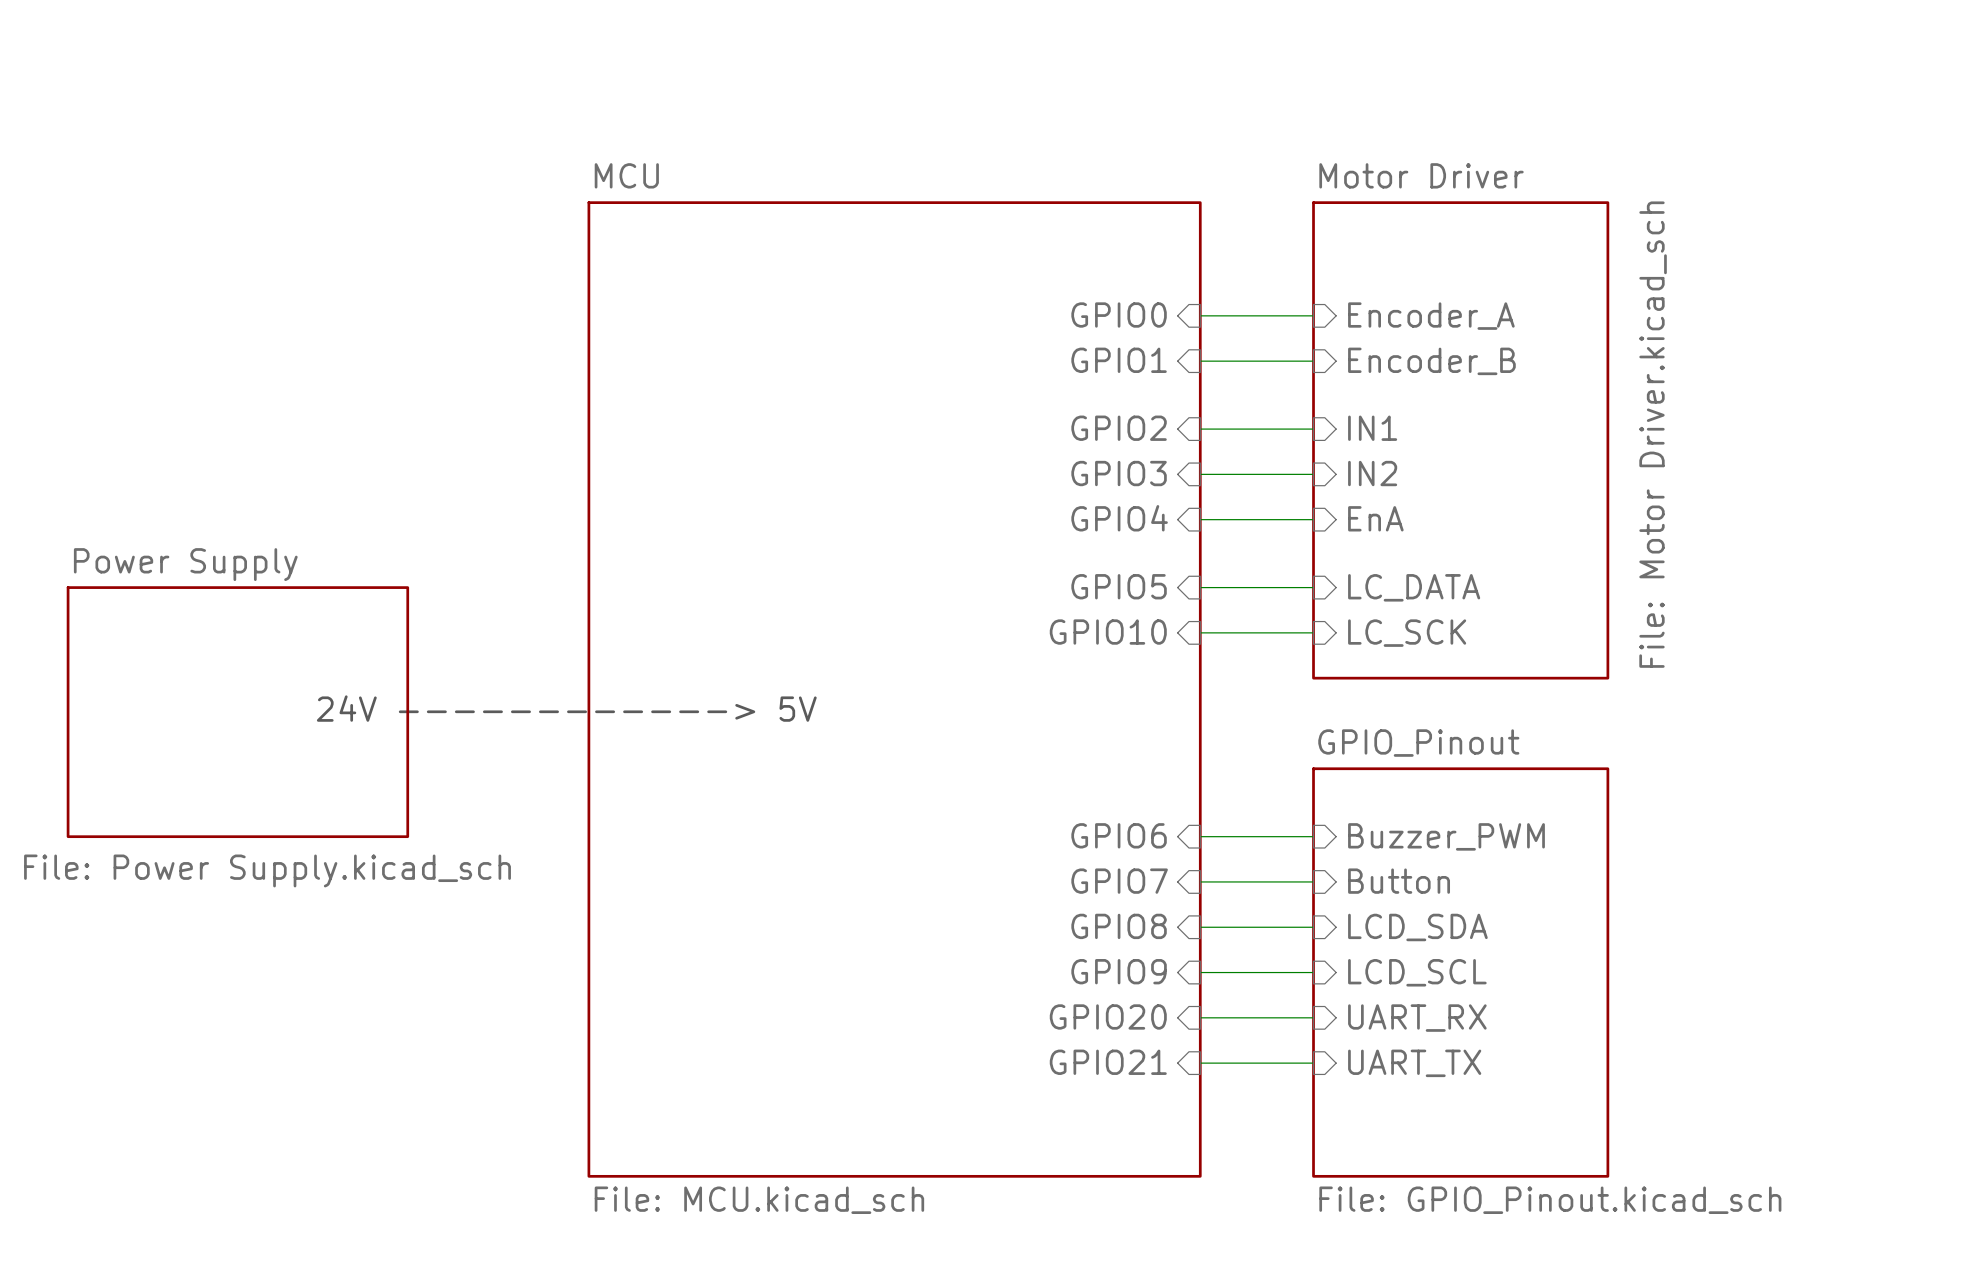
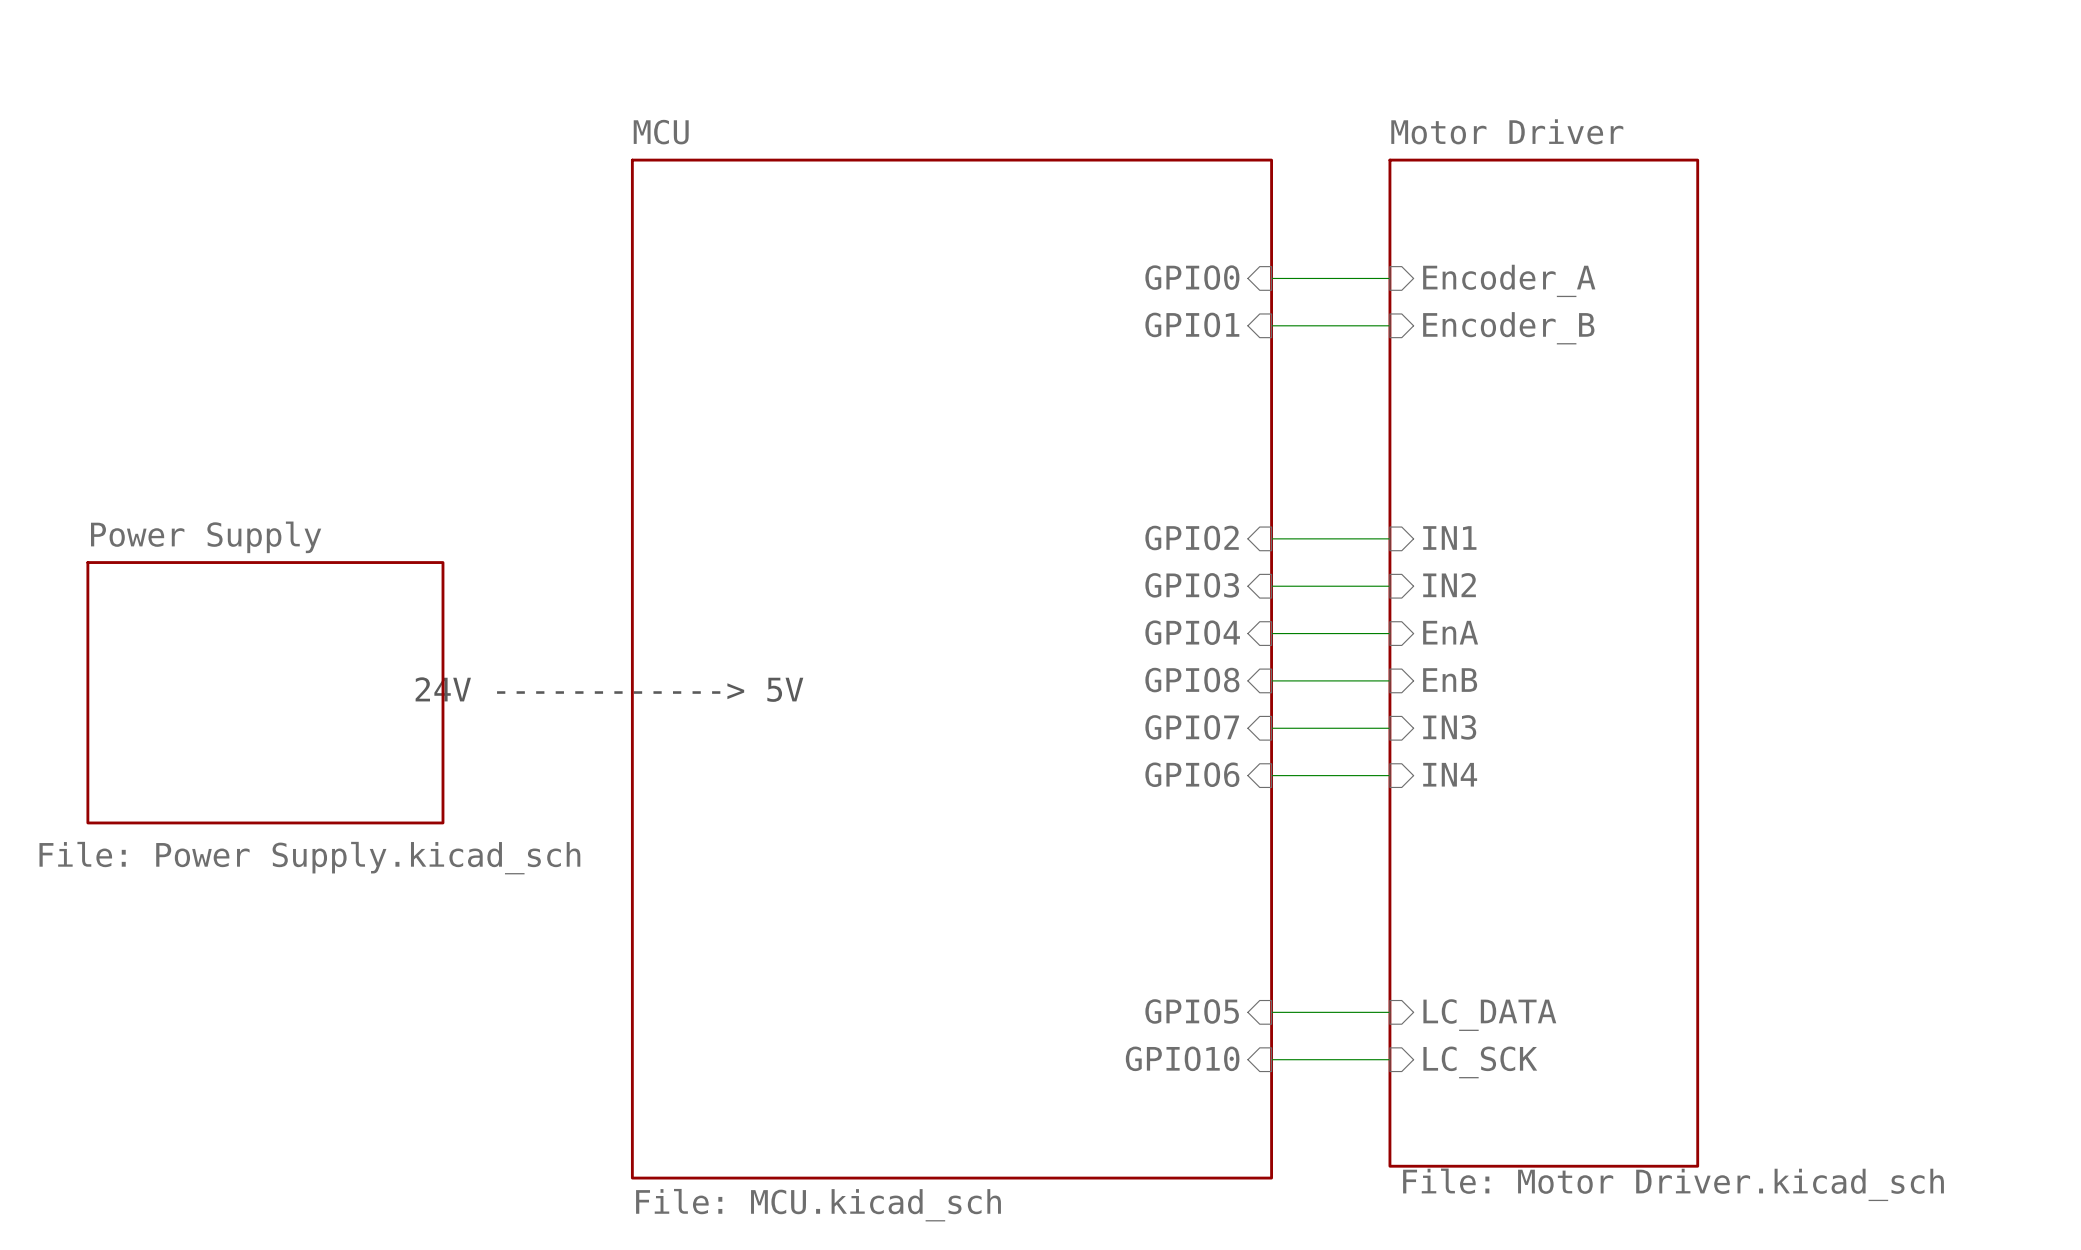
sheet pin position: GPIO2 (1119, 428) -> GPIO2 (1192, 538)
sheet pin position: IN1 (1372, 428) -> IN1 (1449, 537)
wire: (1200, 429) (1313, 429) -> (1271, 538) (1389, 538)
sheet Motor Driver: File: Motor Driver.kicad_sch (1460, 440) -> none
sheet pin position: GPIO3 (1119, 473) -> GPIO3 (1192, 585)
sheet pin position: IN2 (1372, 473) -> IN2 (1449, 585)
wire: (1200, 474) (1313, 474) -> (1271, 586) (1389, 586)
sheet pin position: GPIO4 (1119, 518) -> GPIO4 (1192, 632)
sheet pin position: EnA (1375, 518) -> EnA (1450, 632)
wire: (1200, 519) (1313, 519) -> none
sheet pin: GPIO5 (1119, 586) -> none
wire: (1200, 587) (1313, 587) -> none
sheet pin: LC_DATA (1414, 587) -> none
sheet pin: GPIO10 (1108, 632) -> none
wire: (1200, 632) (1313, 632) -> none
sheet pin: LC_SCK (1407, 633) -> none
sheet Motor Driver: none -> File: Motor Driver.kicad_sch (1543, 663)
sheet pin: none -> EnB (1450, 680)
sheet pin: none -> IN3 (1449, 727)
sheet pin: none -> IN4 (1450, 774)
sheet pin position: GPIO6 (1119, 835) -> GPIO6 (1192, 774)
wire: (1200, 836) (1313, 836) -> (1271, 633) (1389, 633)
sheet pin: Buzzer_PWM (1446, 836) -> none
sheet pin position: GPIO7 (1119, 881) -> GPIO7 (1192, 727)
wire: (1200, 881) (1313, 881) -> (1271, 680) (1389, 680)
sheet pin: Button (1399, 881) -> none
sheet pin position: GPIO8 (1119, 926) -> GPIO8 (1192, 680)
wire: (1200, 927) (1313, 927) -> (1271, 728) (1389, 728)
sheet pin: LCD_SDA (1417, 927) -> none
sheet pin: GPIO9 (1119, 971) -> none
wire: (1200, 972) (1313, 972) -> (1271, 775) (1389, 775)
sheet pin: LCD_SCL (1417, 972) -> none
sheet GPIO_Pinout: File: GPIO_Pinout.kicad_sch (1460, 972) -> none
sheet pin: GPIO20 (1108, 1016) -> GPIO5 (1192, 1011)
sheet pin: UART_RX (1417, 1018) -> LC_DATA (1489, 1015)
sheet pin: GPIO21 (1108, 1062) -> GPIO10 (1182, 1058)
sheet pin: UART_TX (1414, 1063) -> LC_SCK (1480, 1062)

